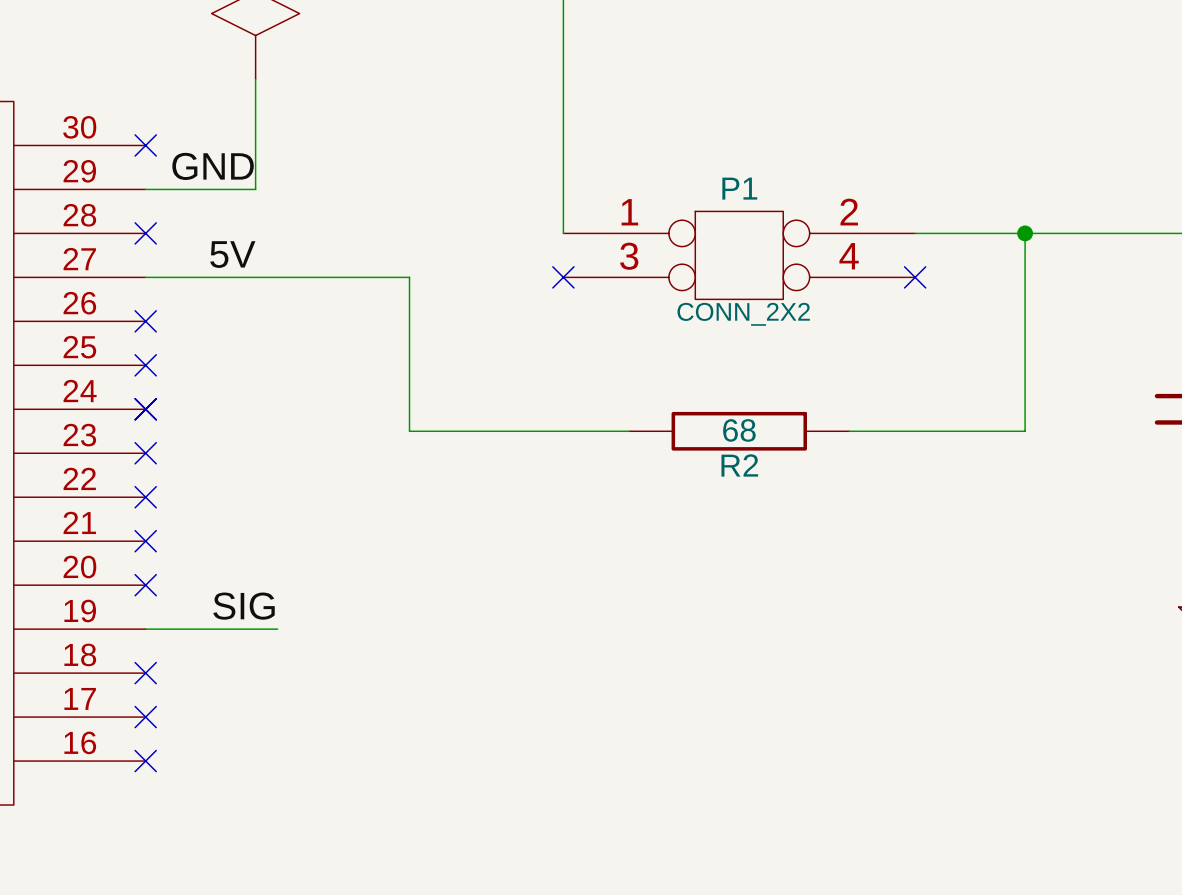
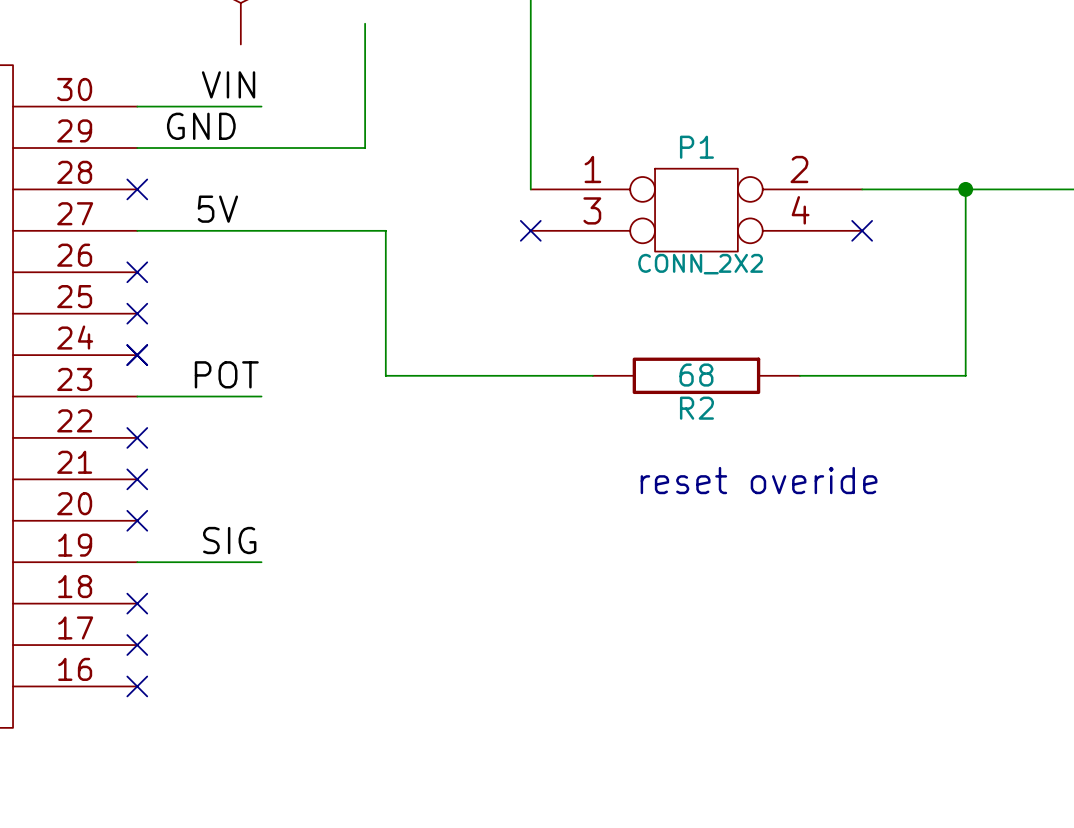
wire: (255, 79) (255, 189) -> (365, 23) (365, 148) (240, 148)
label: none -> VIN (228, 84)
wire: none -> (137, 106) (261, 106)
no-connect mark: (145, 145) -> none
label: none -> POT (226, 374)
wire: none -> (137, 396) (261, 396)
no-connect mark: (145, 453) -> none
text: none -> reset overide (759, 480)

